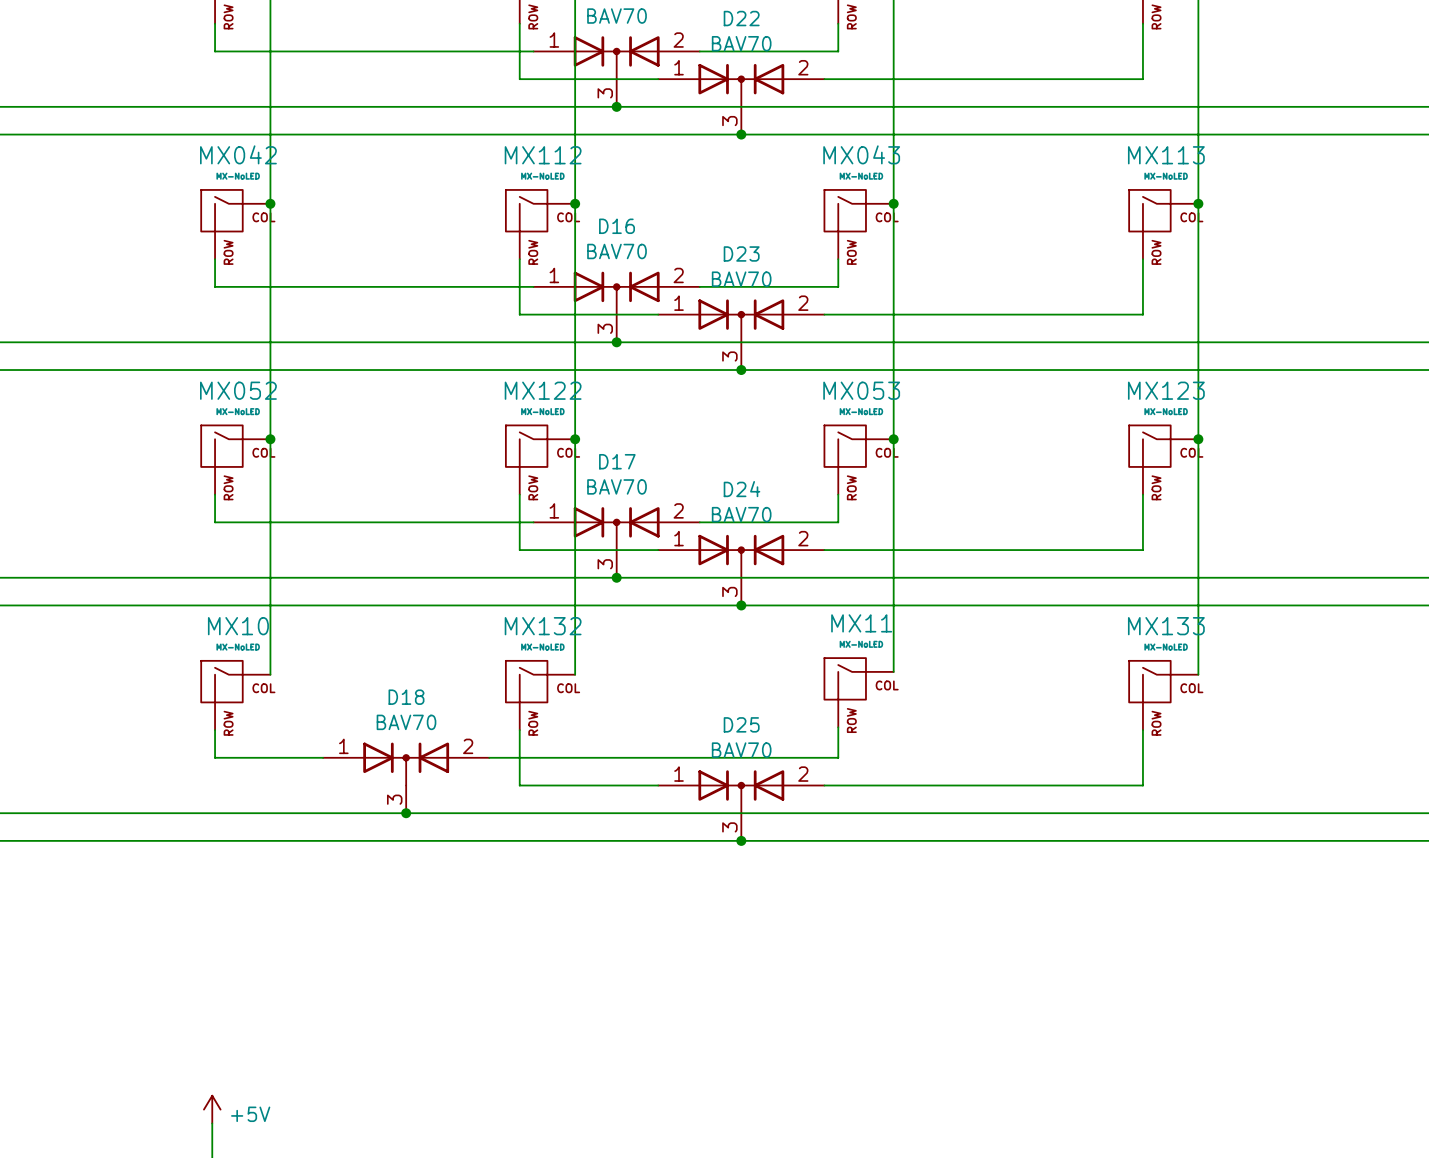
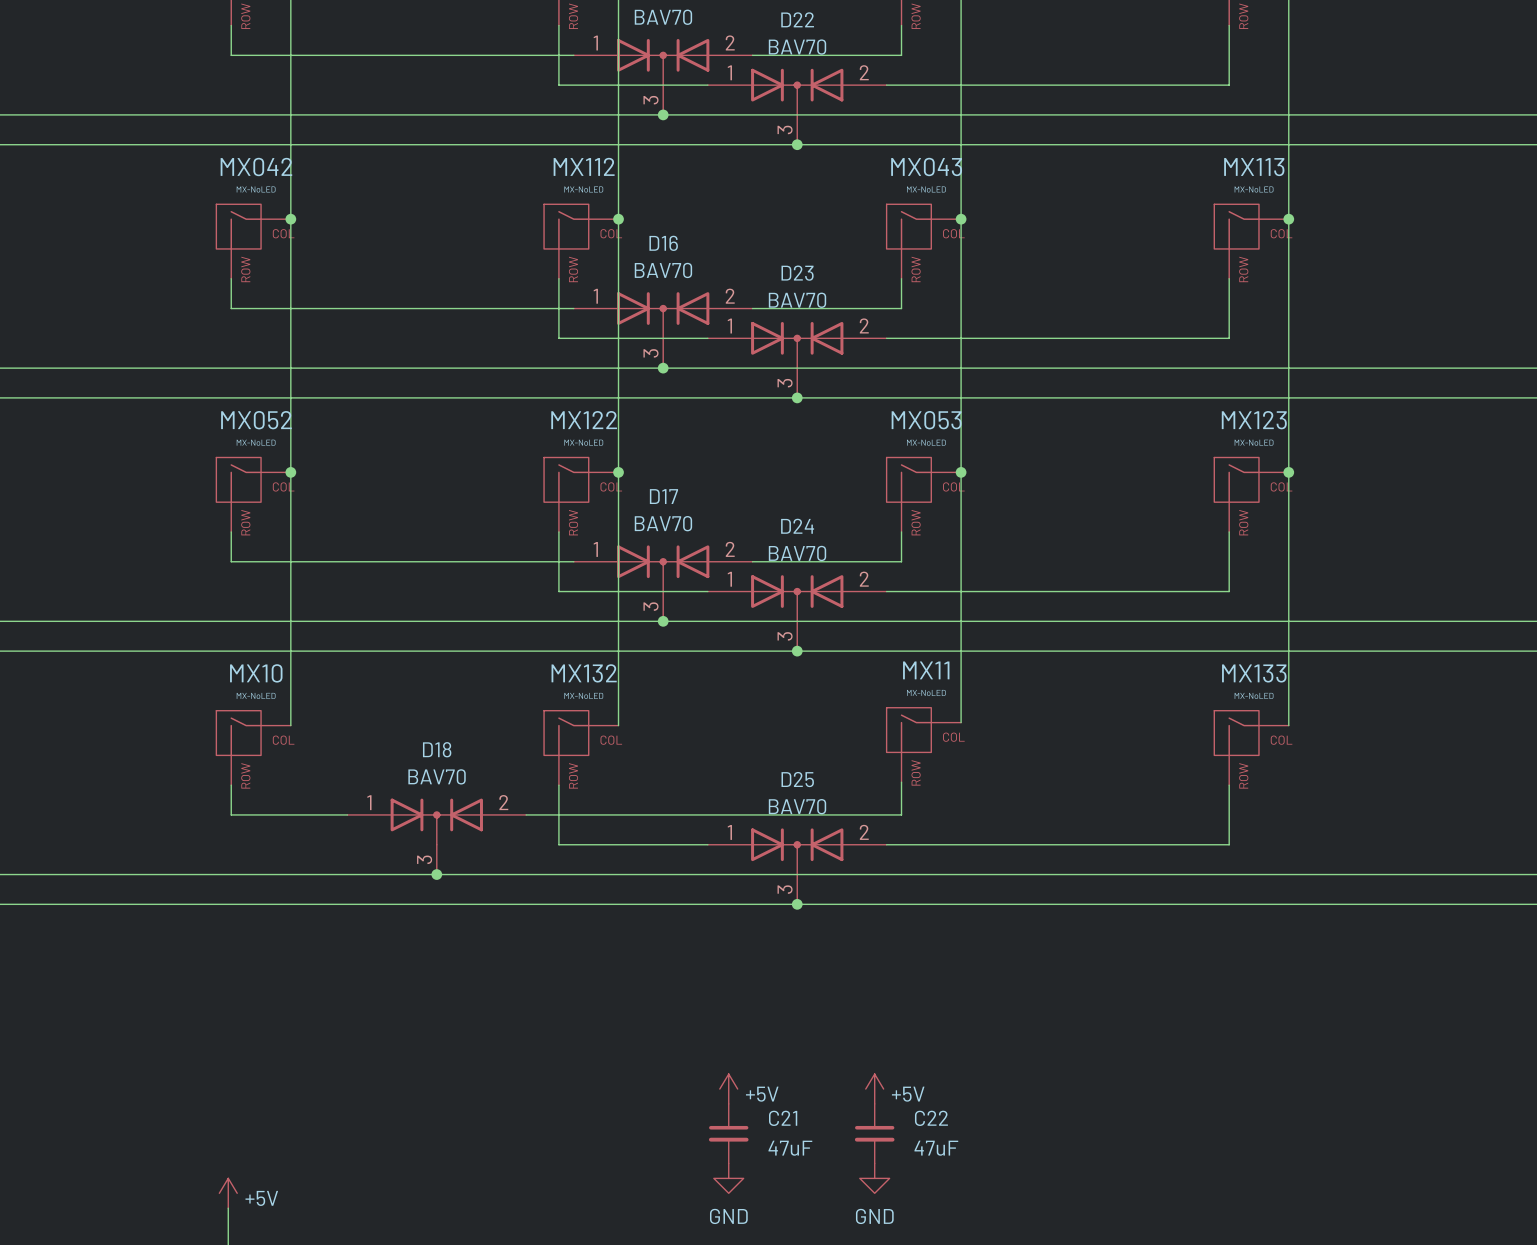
power symbol: none -> +5V (728, 1089)
power symbol: none -> +5V (874, 1089)
C21: none -> 47uF (728, 1133)
C22: none -> 47uF (874, 1133)
power symbol: none -> GND (728, 1178)
power symbol: none -> GND (874, 1178)

